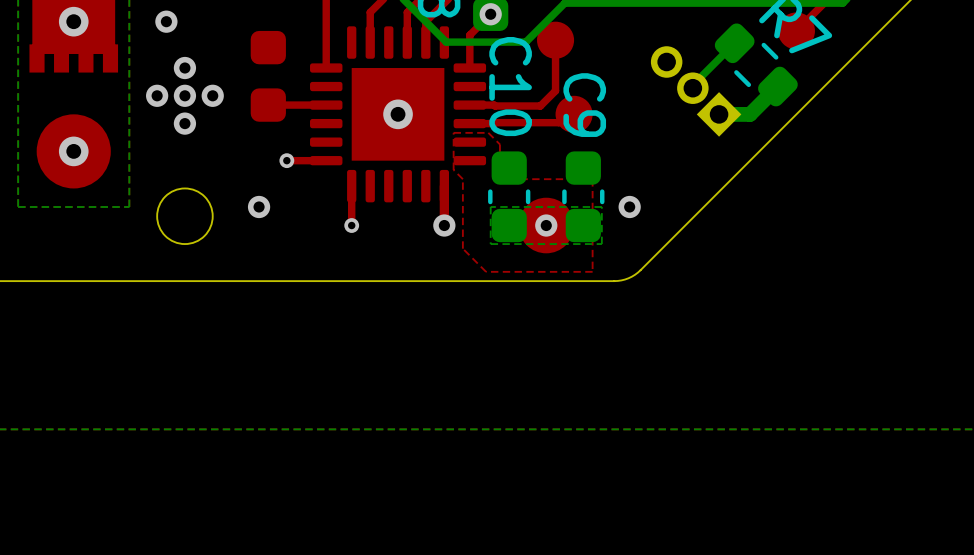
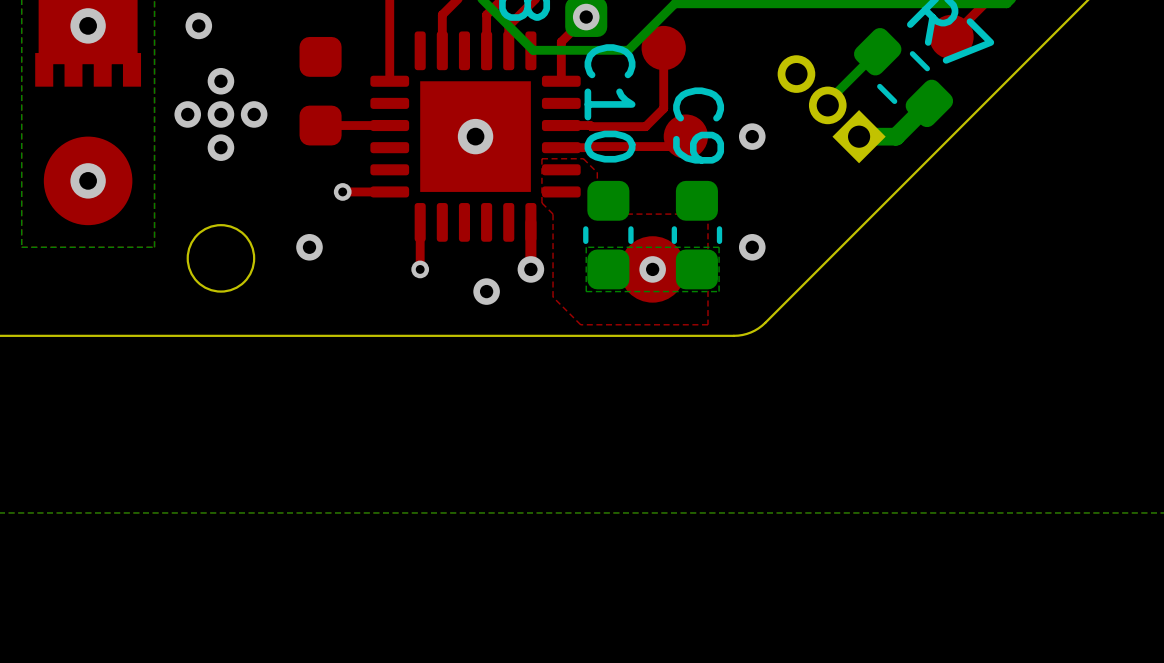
via: none -> (752, 136)
via: none -> (486, 291)

